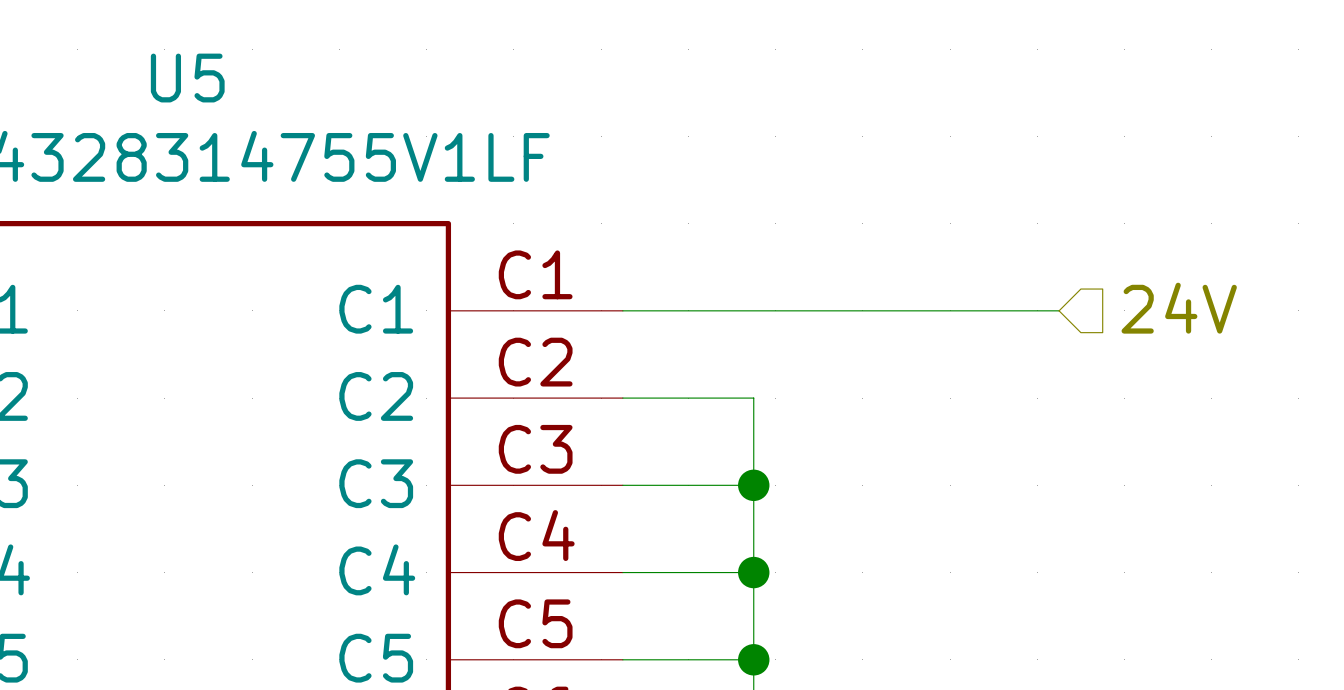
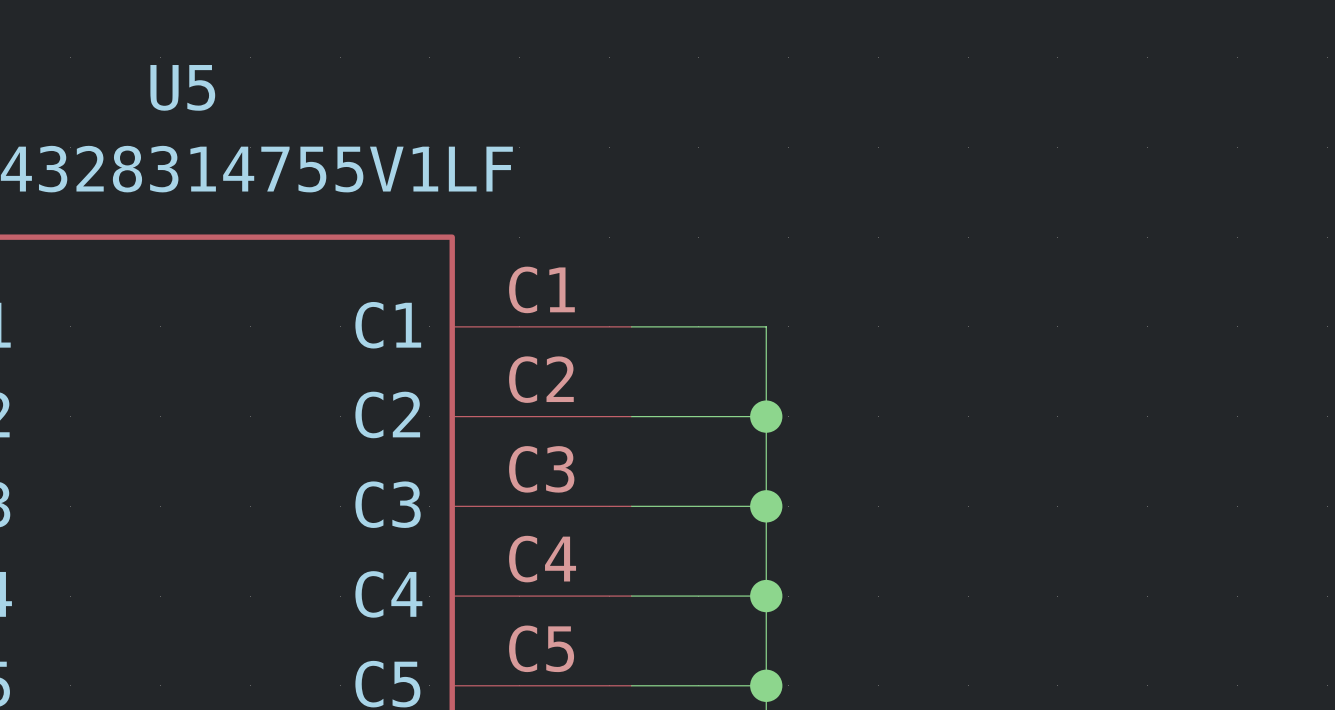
hierarchical label: 24V (1179, 308) -> none
wire: (753, 310) (1059, 310) -> (766, 326) (766, 416)
junction: none -> (766, 416)

